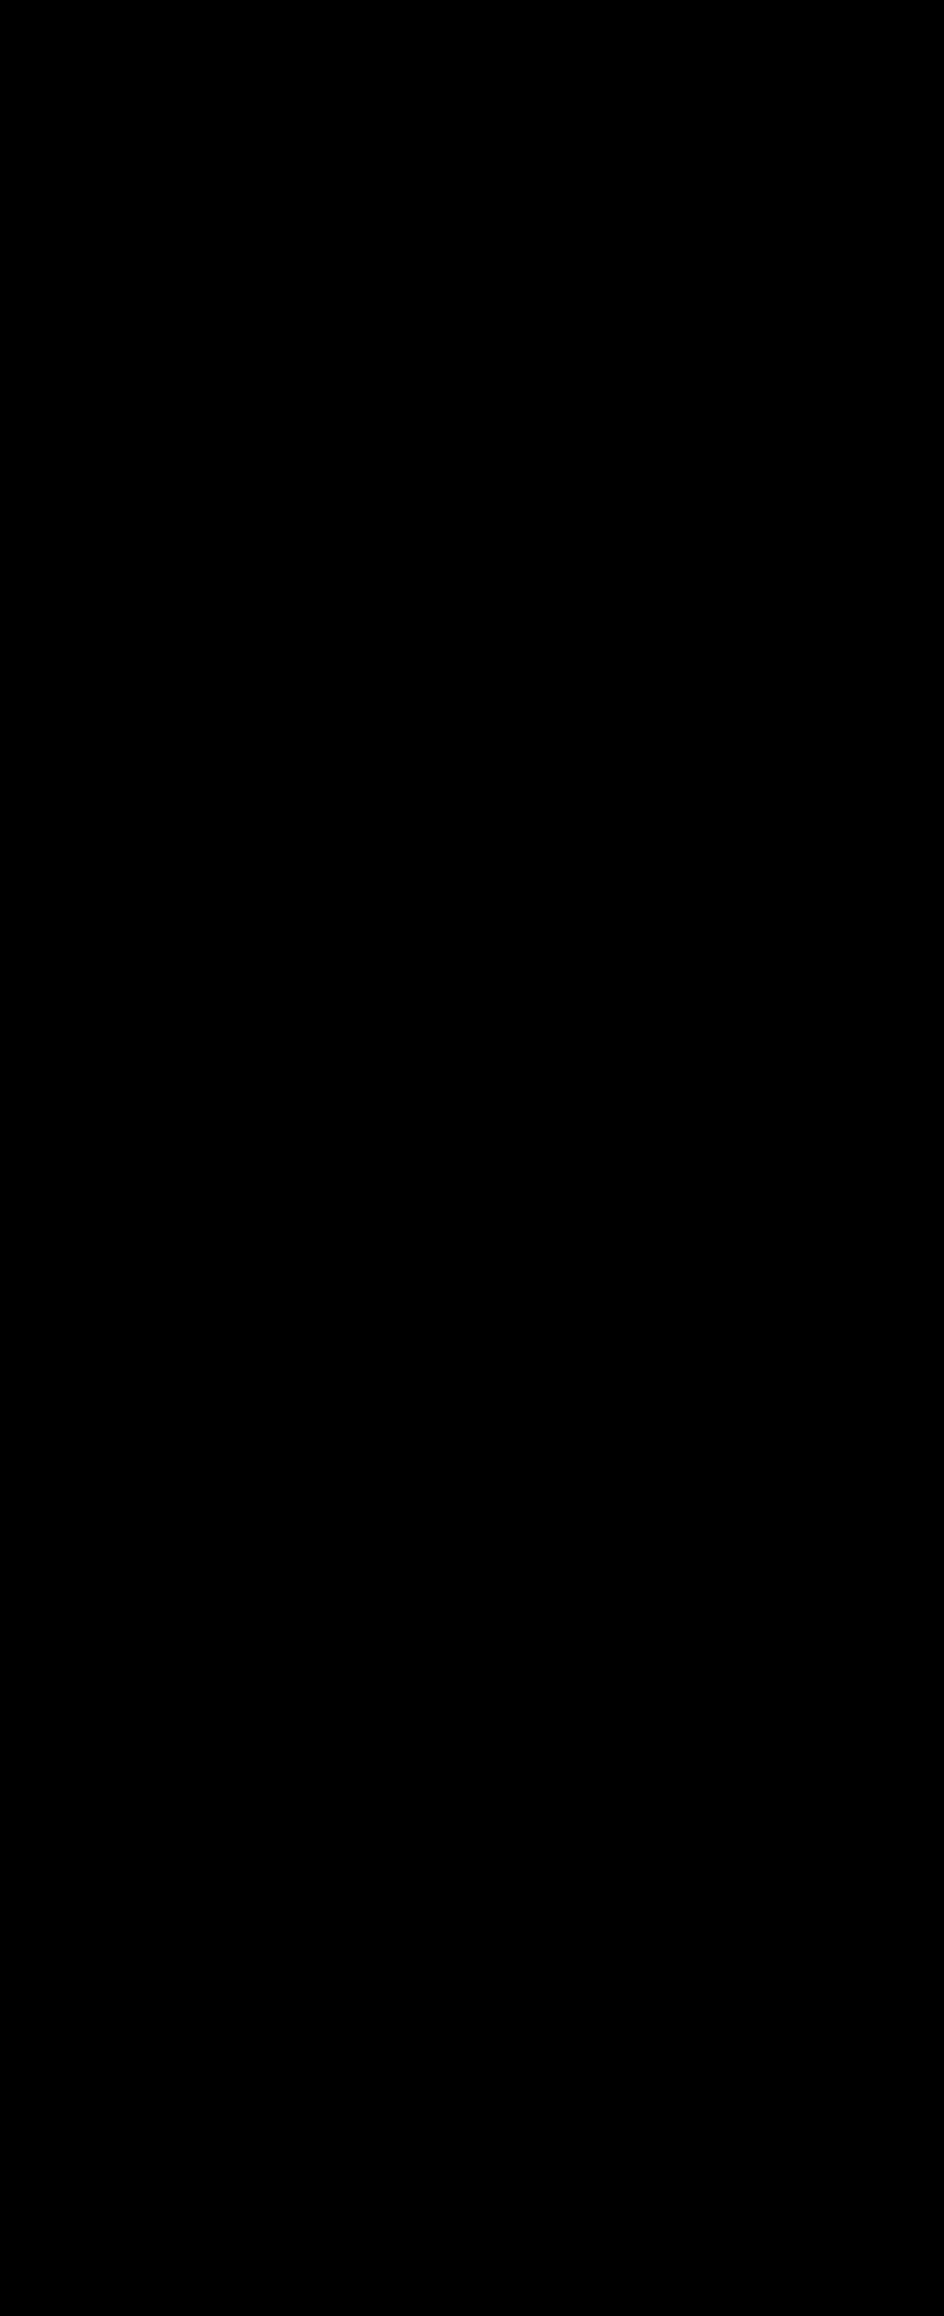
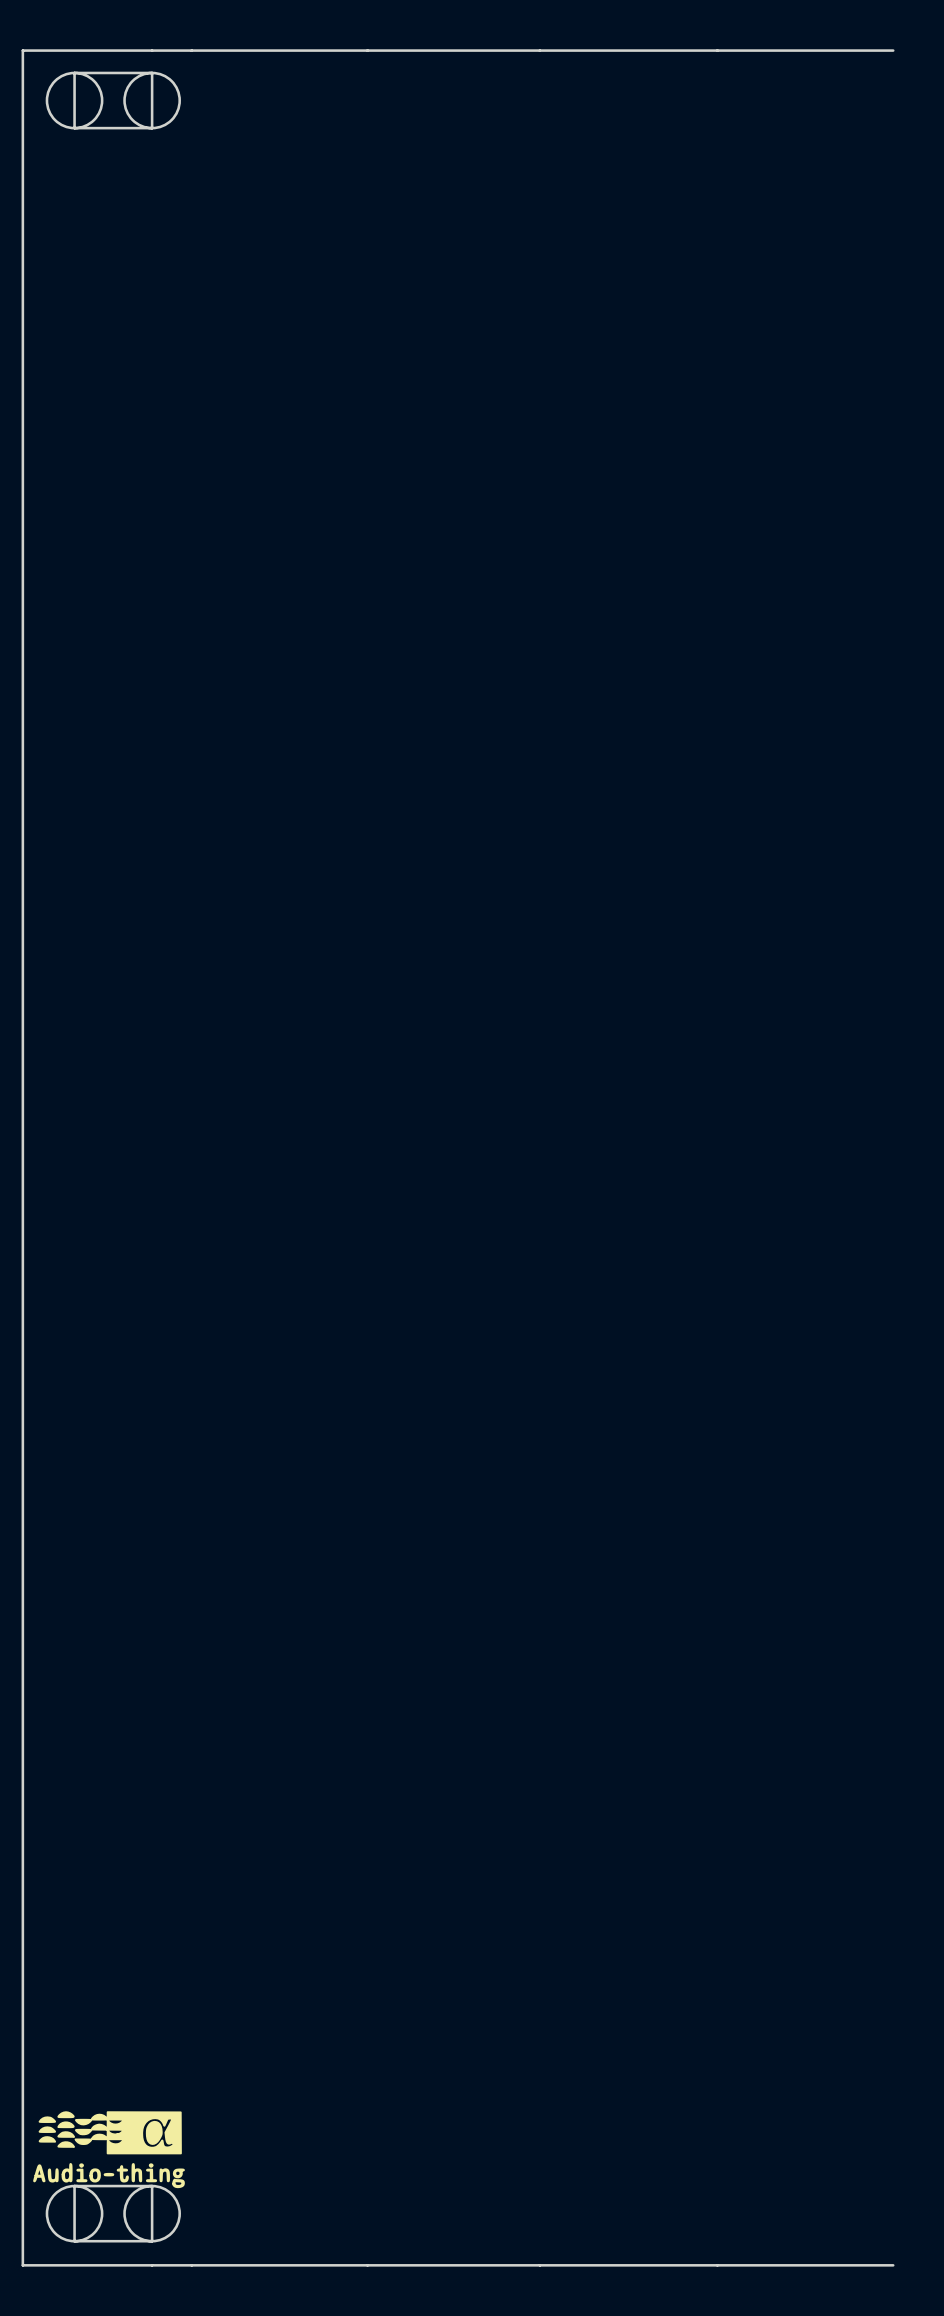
board edge: none -> (893, 50) (22, 50) (22, 2265) (893, 2265)
round board edge: none -> [45, 71, 104, 130]
round board edge: none -> [123, 71, 181, 130]
board edge: none -> (74, 72) (152, 72) (152, 128) (74, 128) (74, 72)
drawing: none -> [33, 2111, 185, 2189]
round board edge: none -> [45, 2184, 104, 2243]
round board edge: none -> [123, 2184, 181, 2243]
board edge: none -> (74, 2186) (74, 2241) (152, 2241) (152, 2186) (74, 2186)

